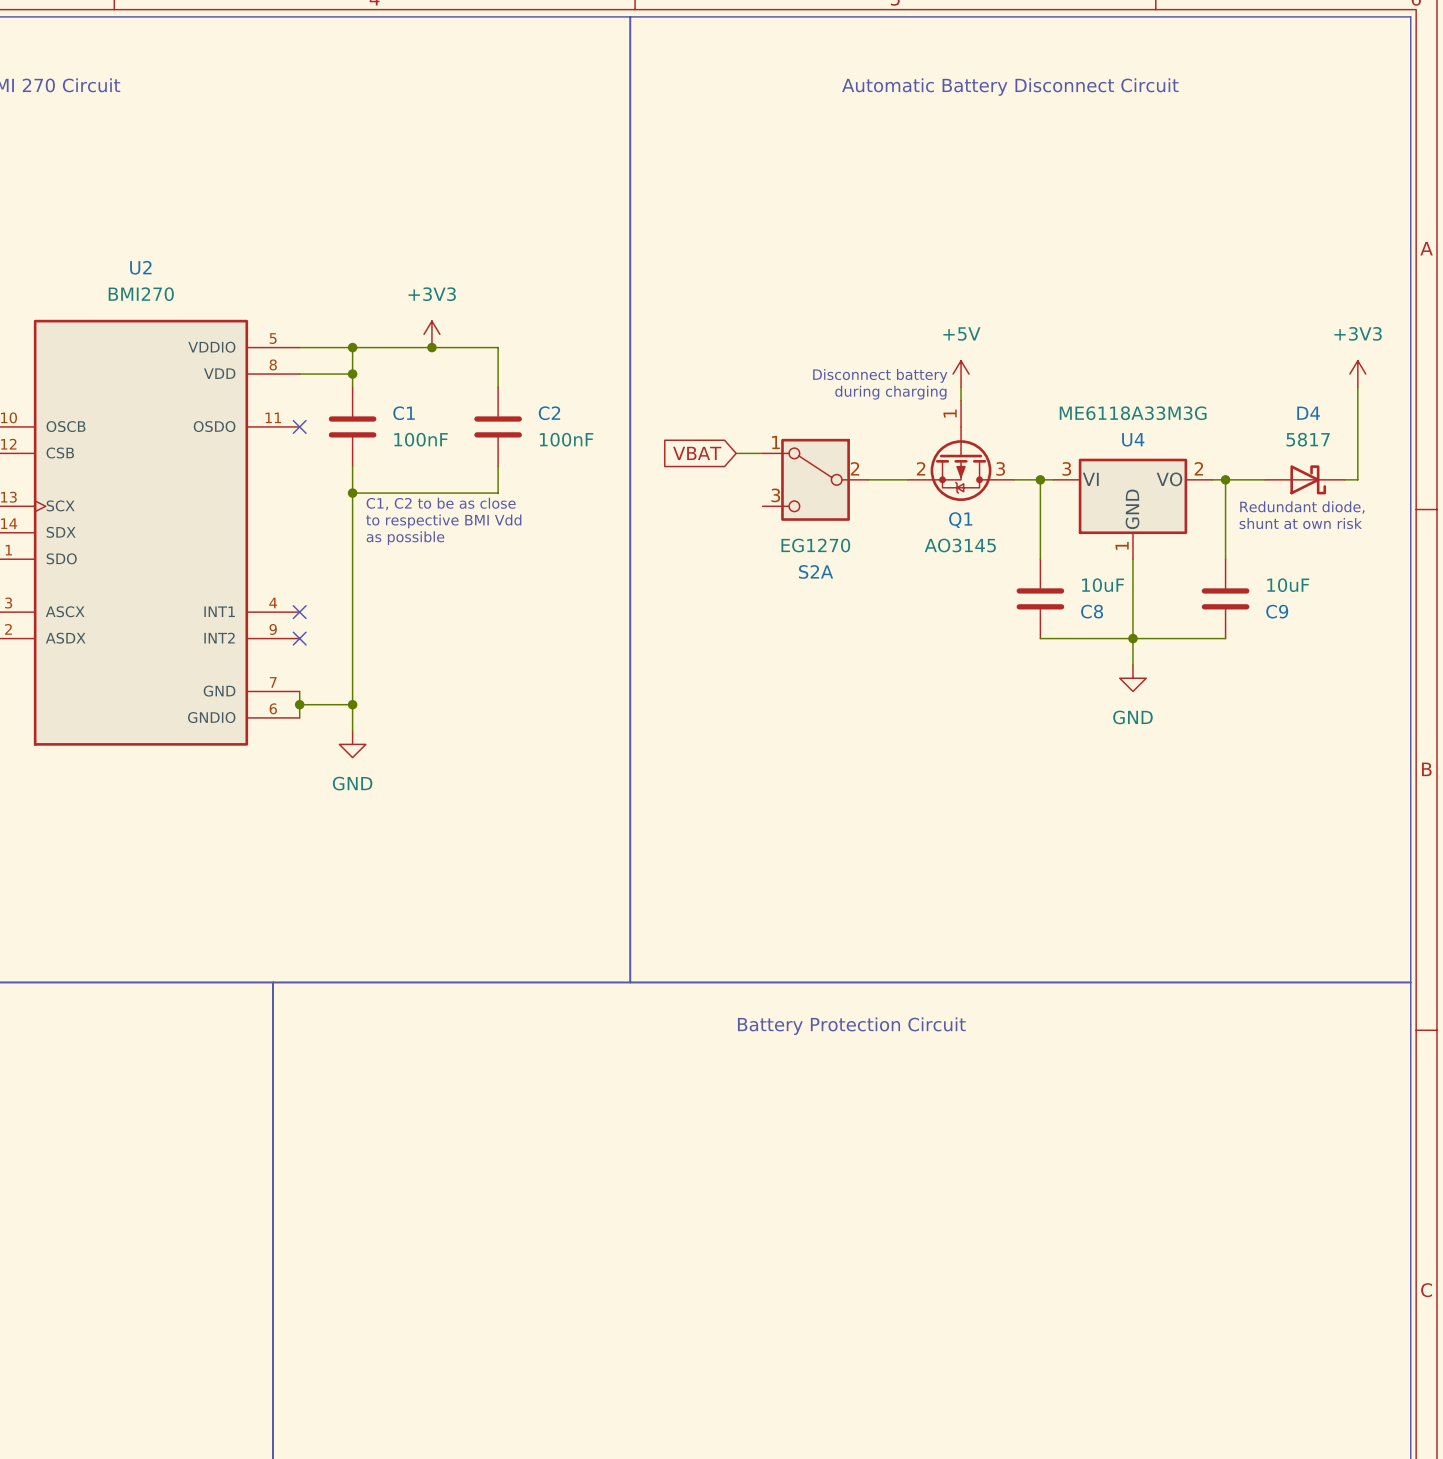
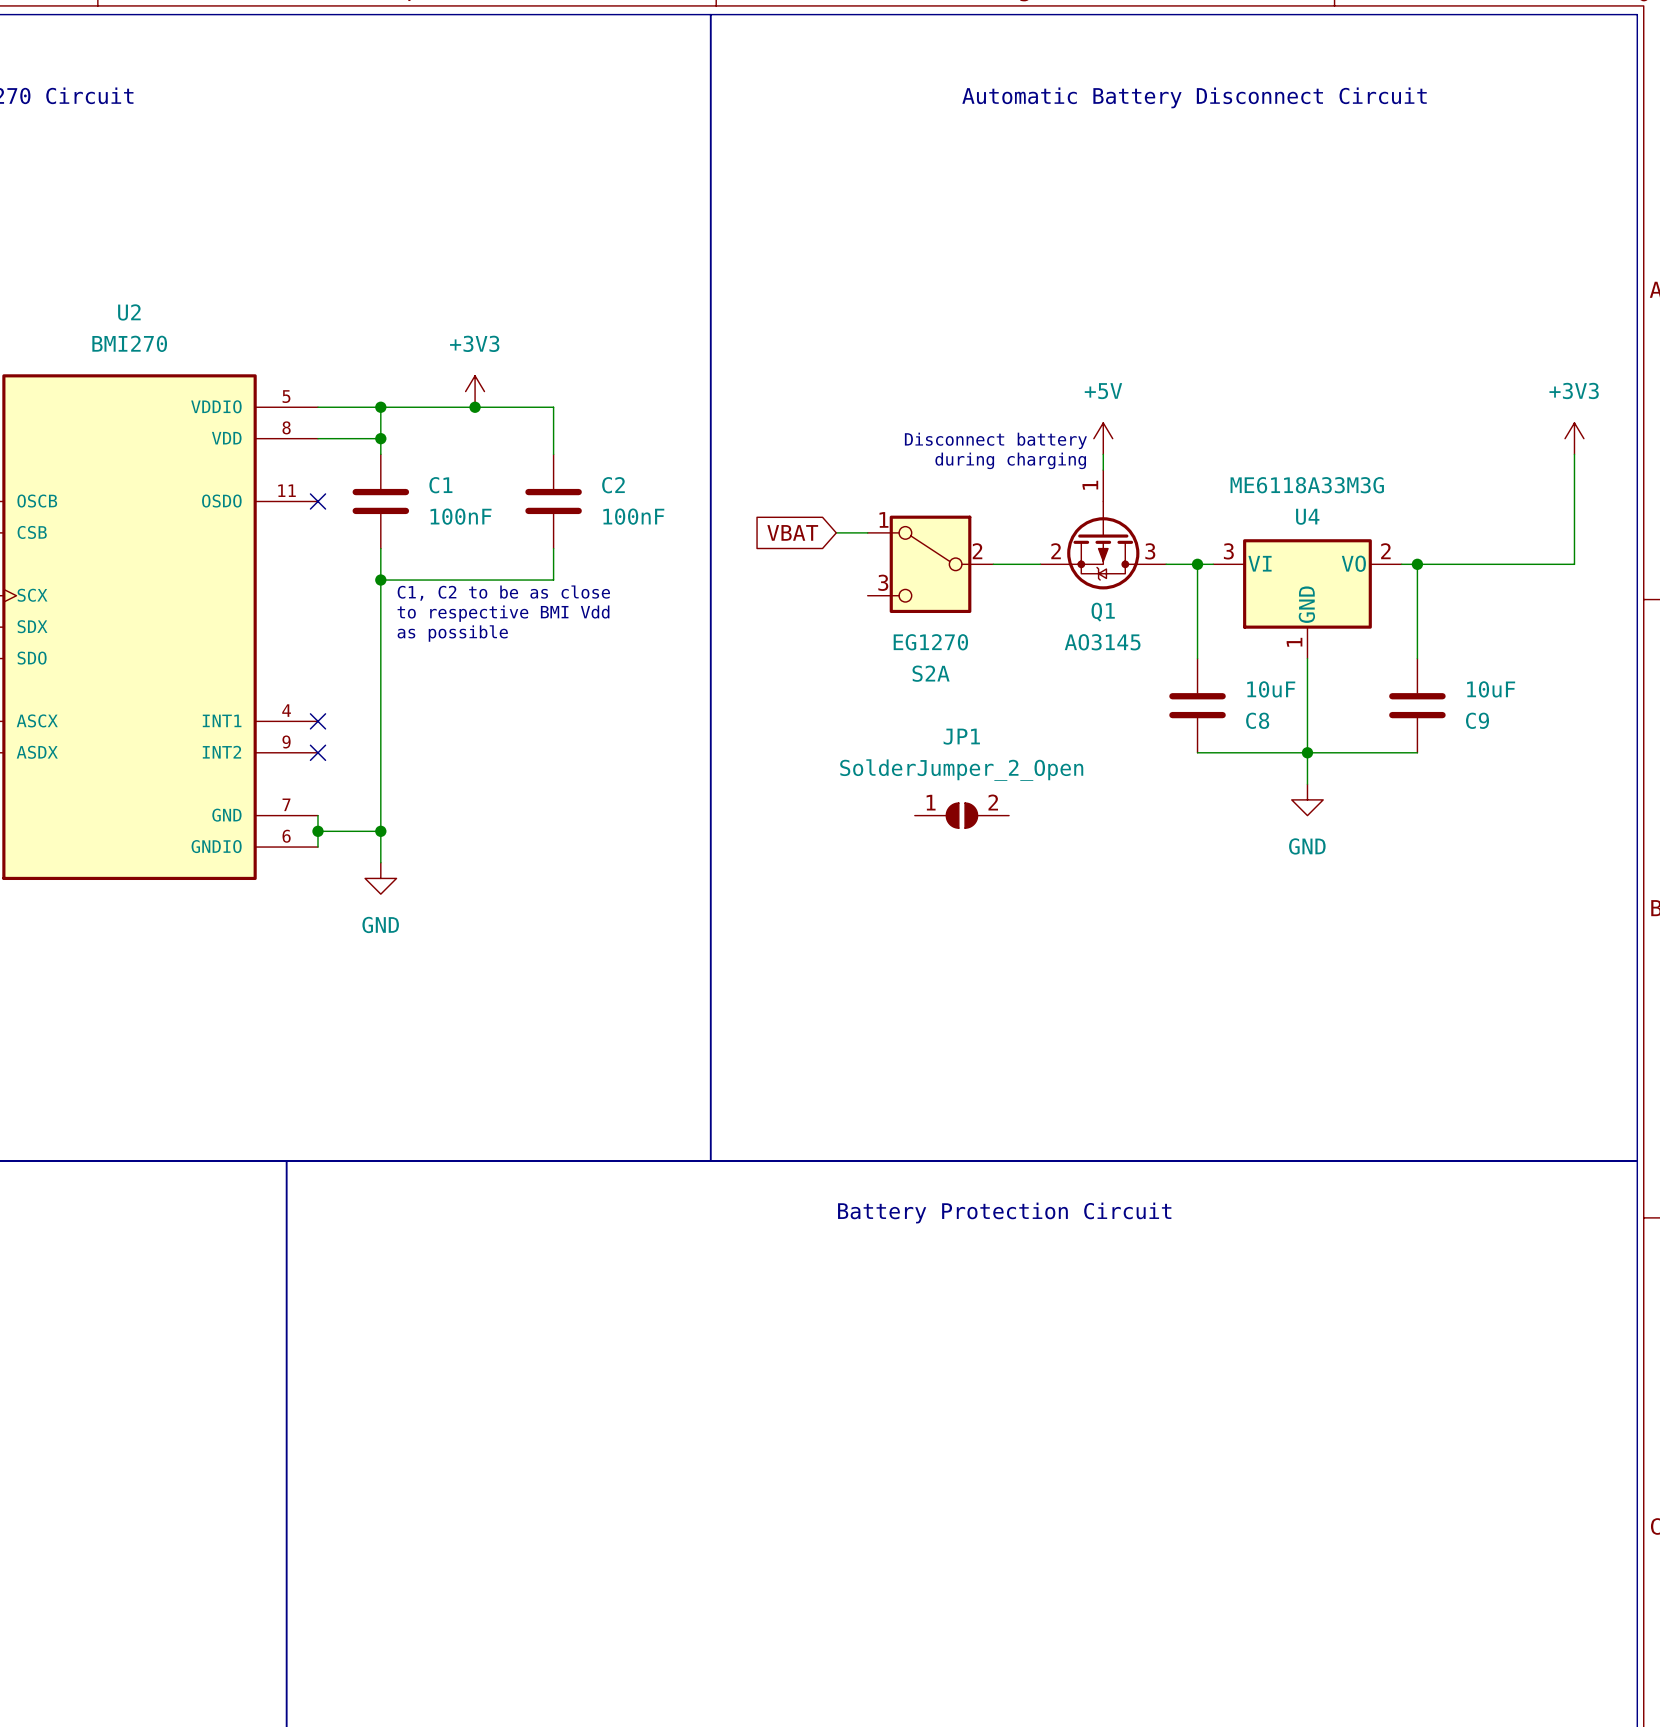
D4: 5817 (1304, 479) -> none
text: Redundant diode, (1302, 507) -> none
text: shunt at own risk (1300, 523) -> none
JP1: none -> SolderJumper_2_Open (961, 815)

